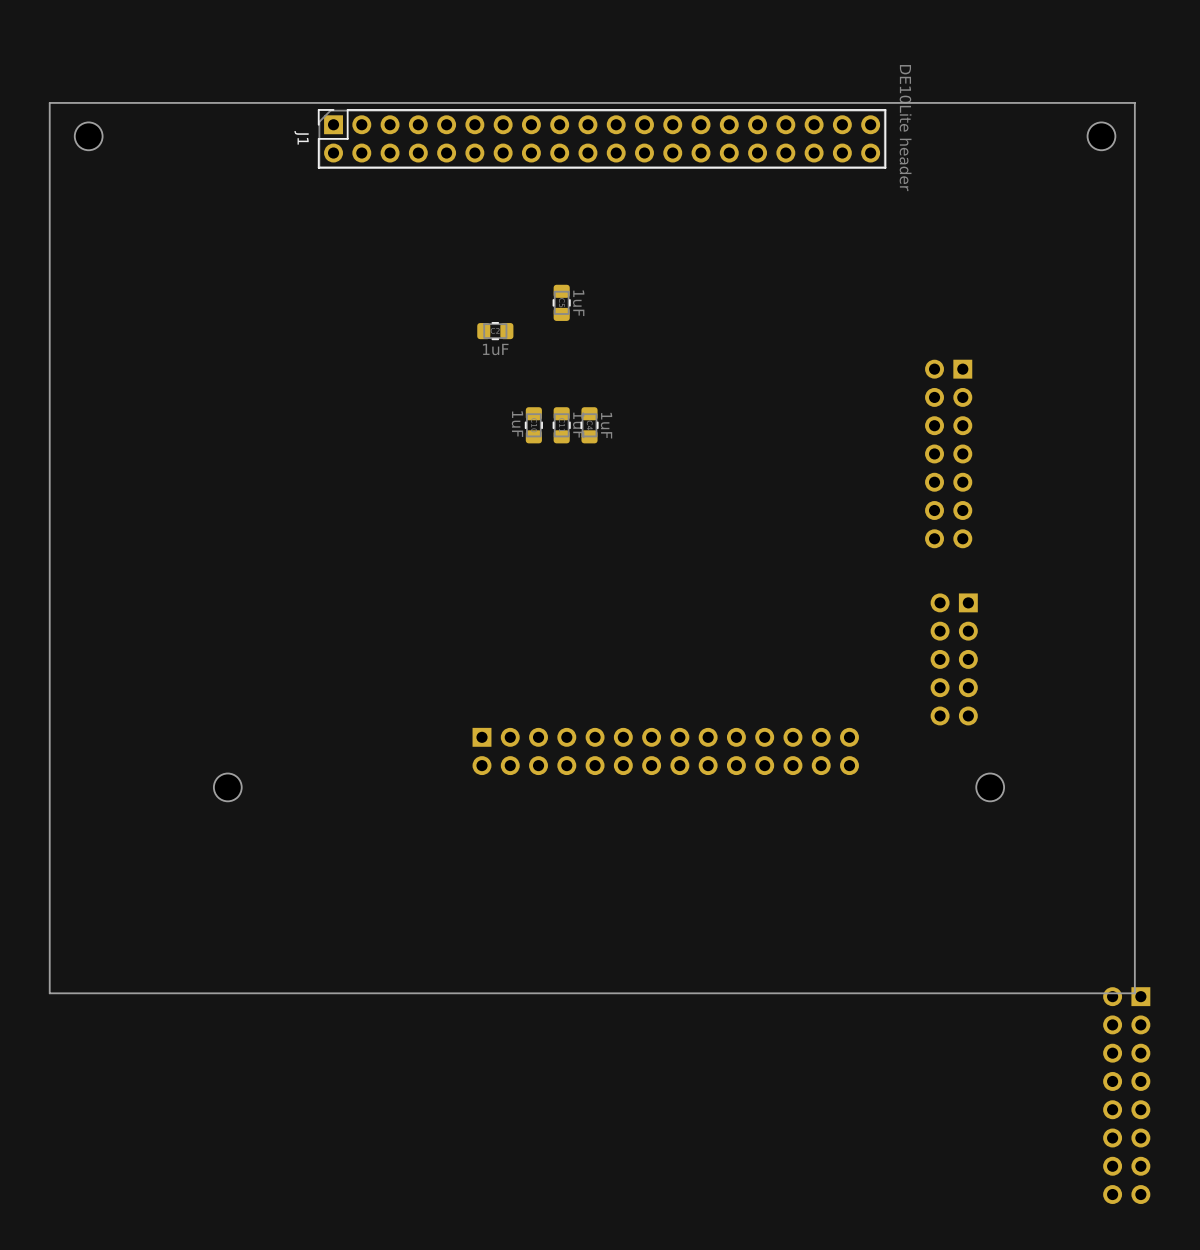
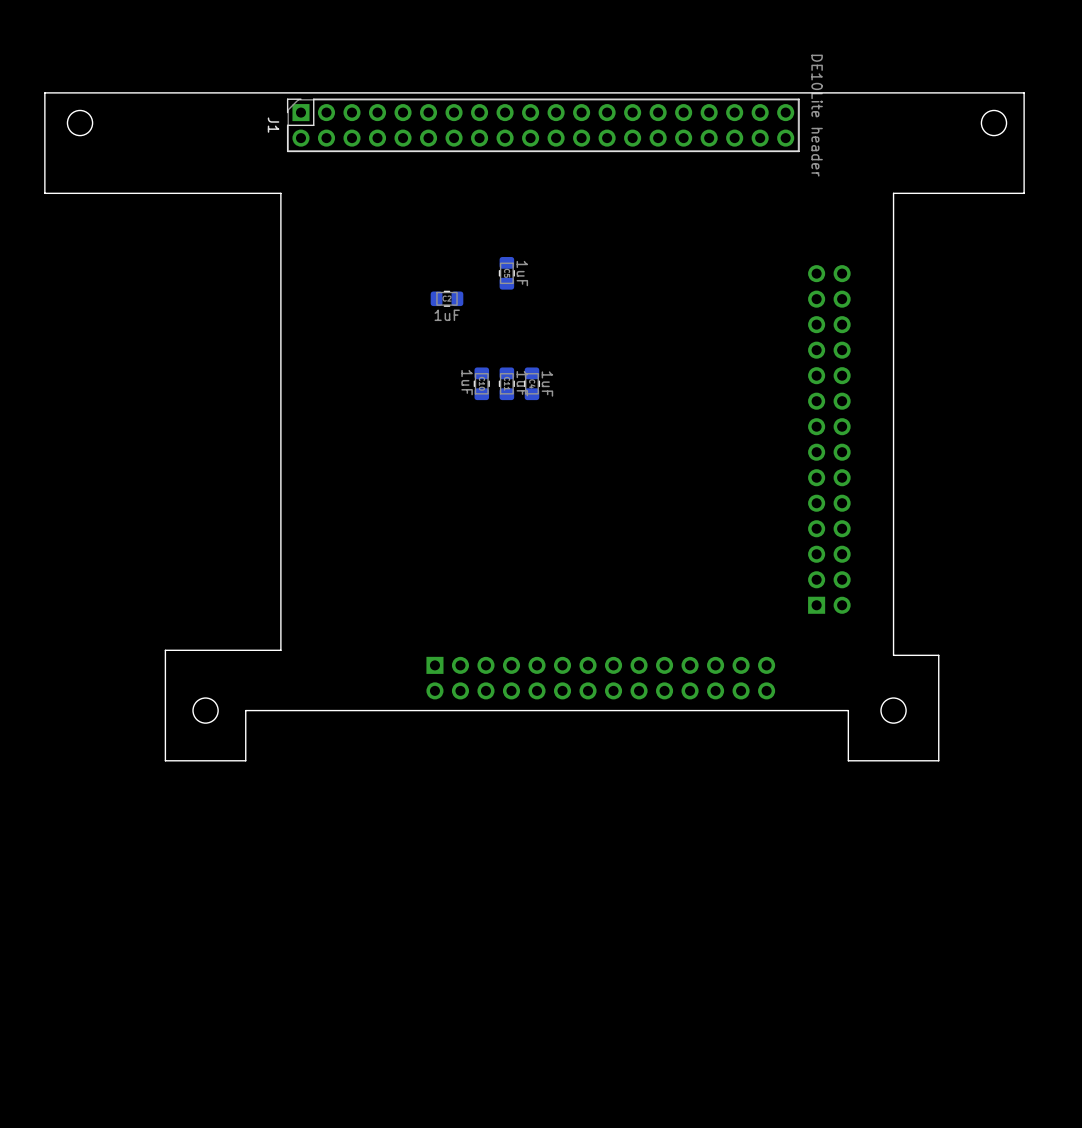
board edge: (1134, 214) (1134, 993) (49, 993) (49, 214) -> (1024, 193) (893, 193) (893, 655) (938, 655) (938, 760) (848, 760) (848, 710) (245, 710) (245, 760) (165, 760) (165, 650) (280, 650) (280, 193) (44, 193)
part: (948, 453) -> none
part: none -> (829, 439)
part: (954, 659) -> none
part: (1126, 1095) -> none

